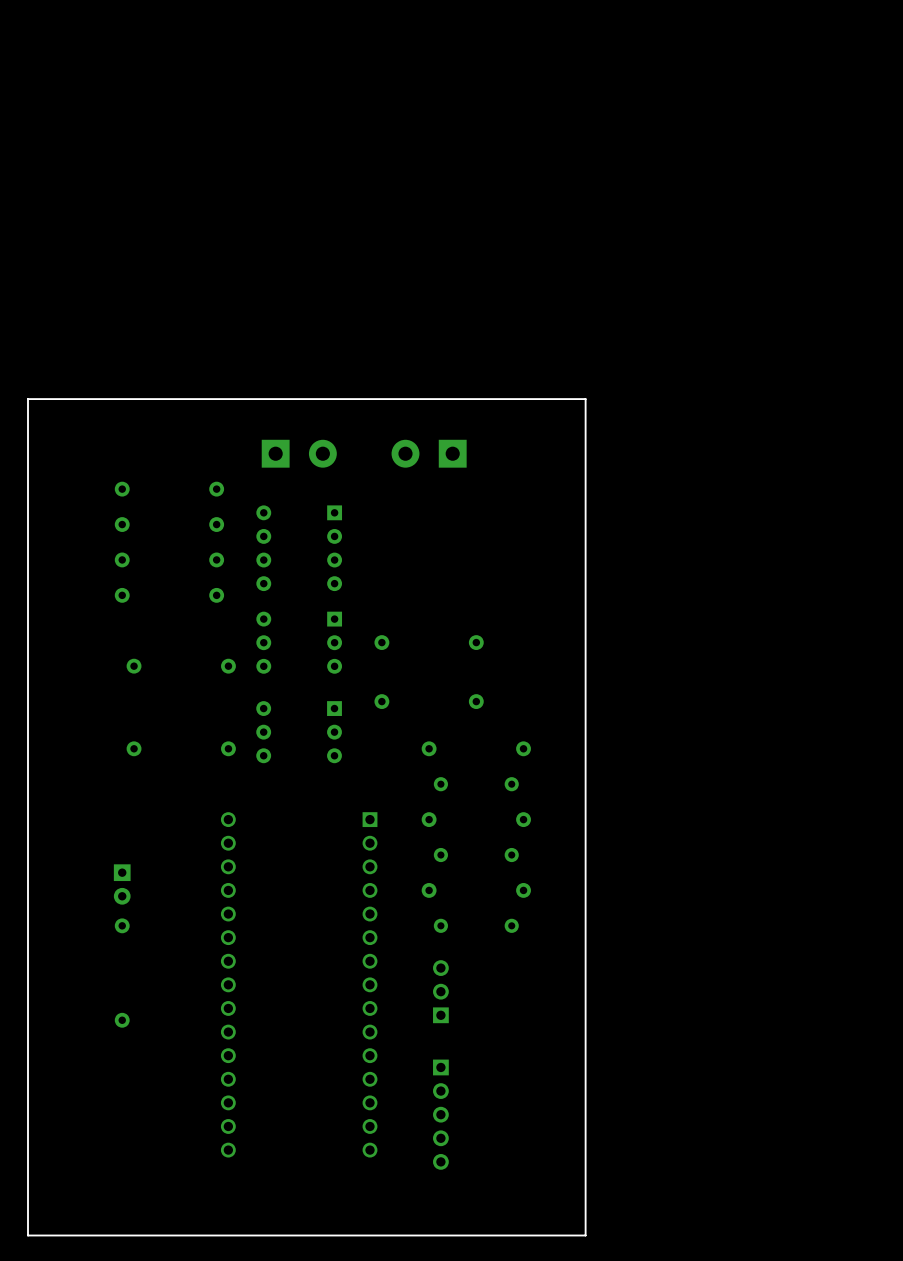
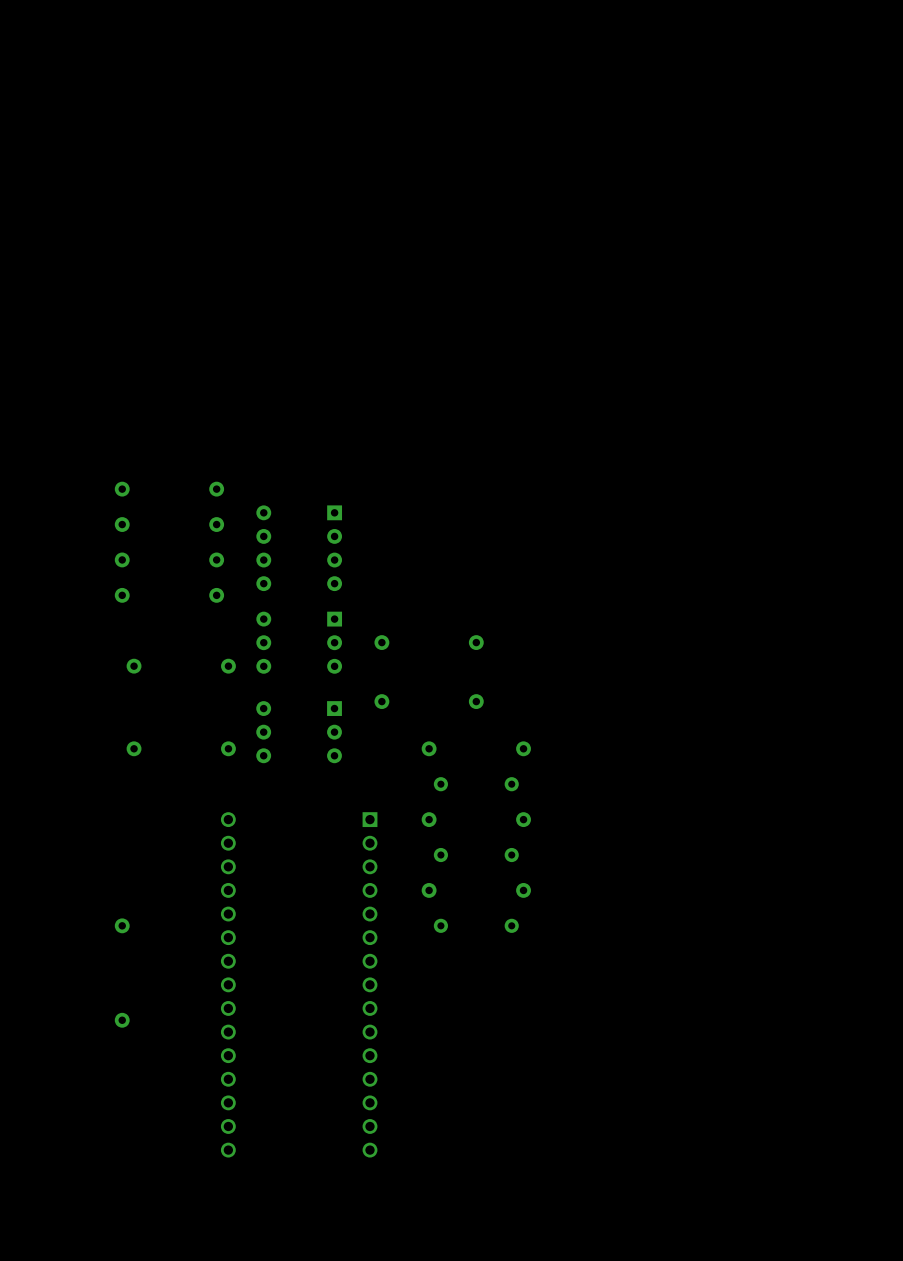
board edge: (585, 399) (27, 399) (27, 1235) (585, 1235) (585, 399) -> none
part: (299, 453) -> none
part: (429, 453) -> none
part: (122, 884) -> none
part: (440, 991) -> none
part: (440, 1114) -> none

